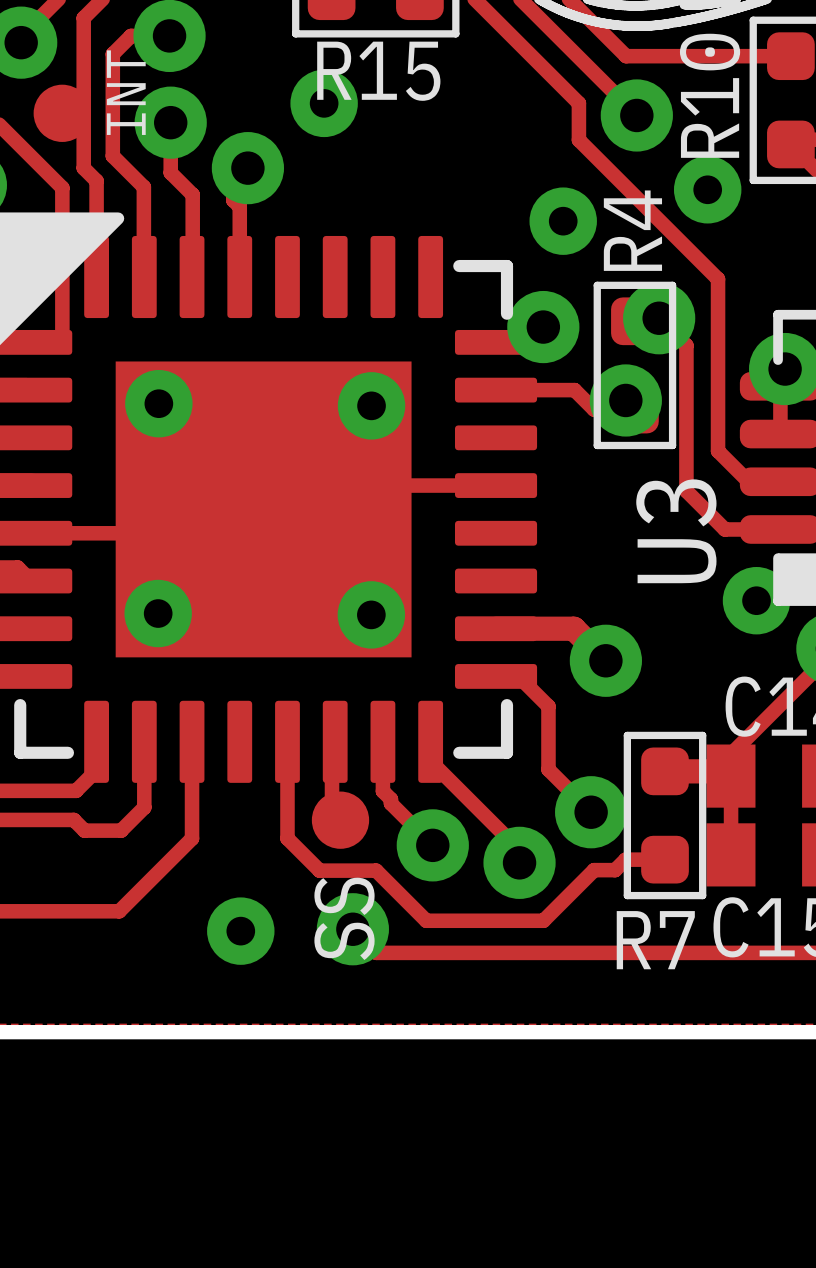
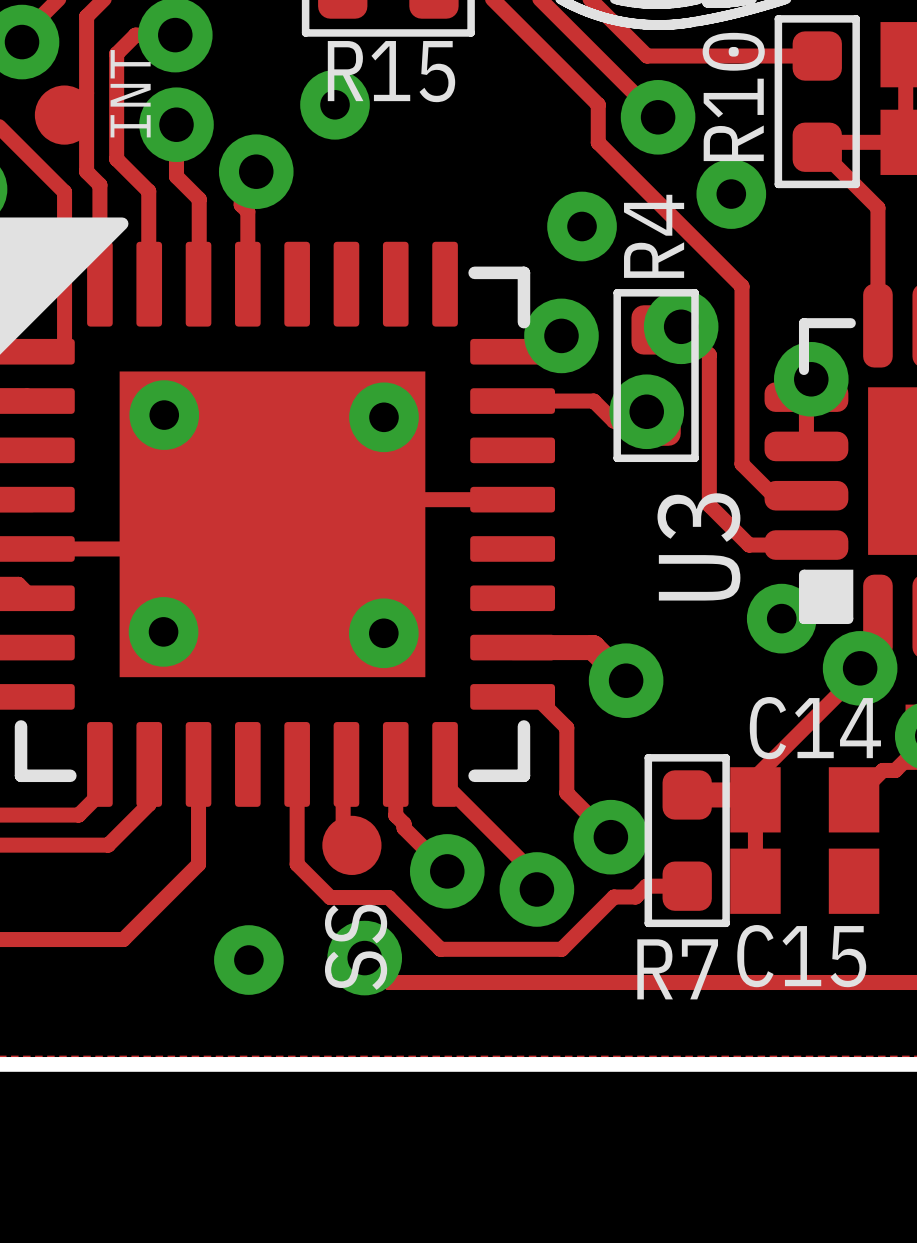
track: (144, 780) (144, 807) (121, 830) (84, 830) (73, 819) -> (149, 804) (108, 845) (76, 845)

